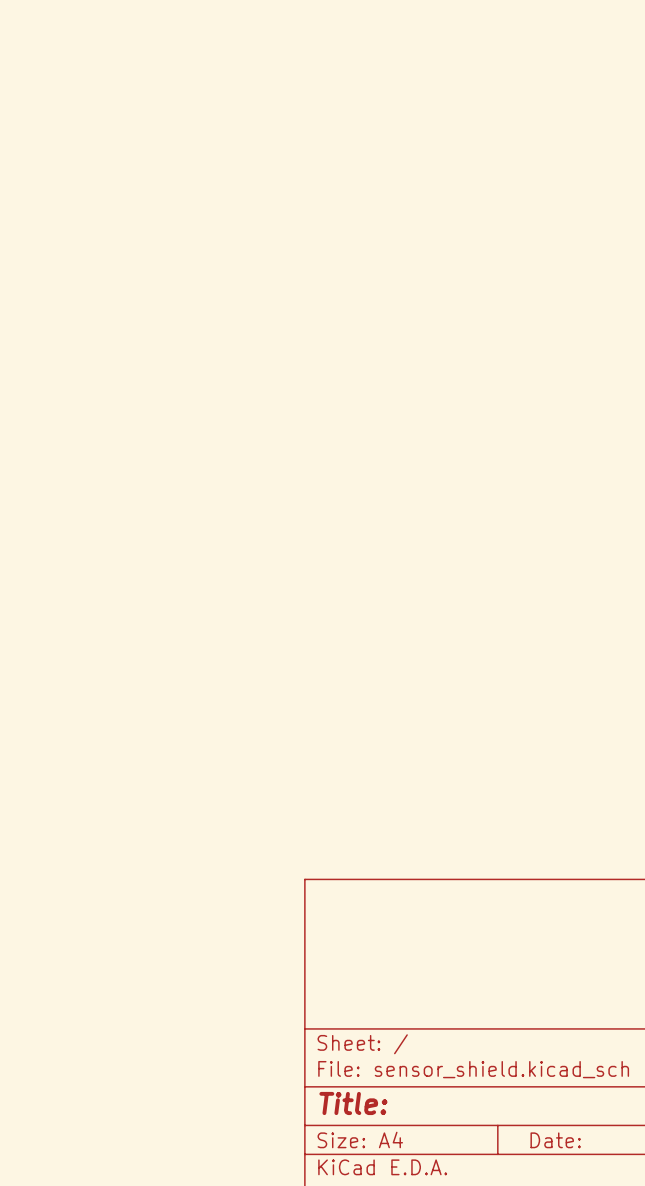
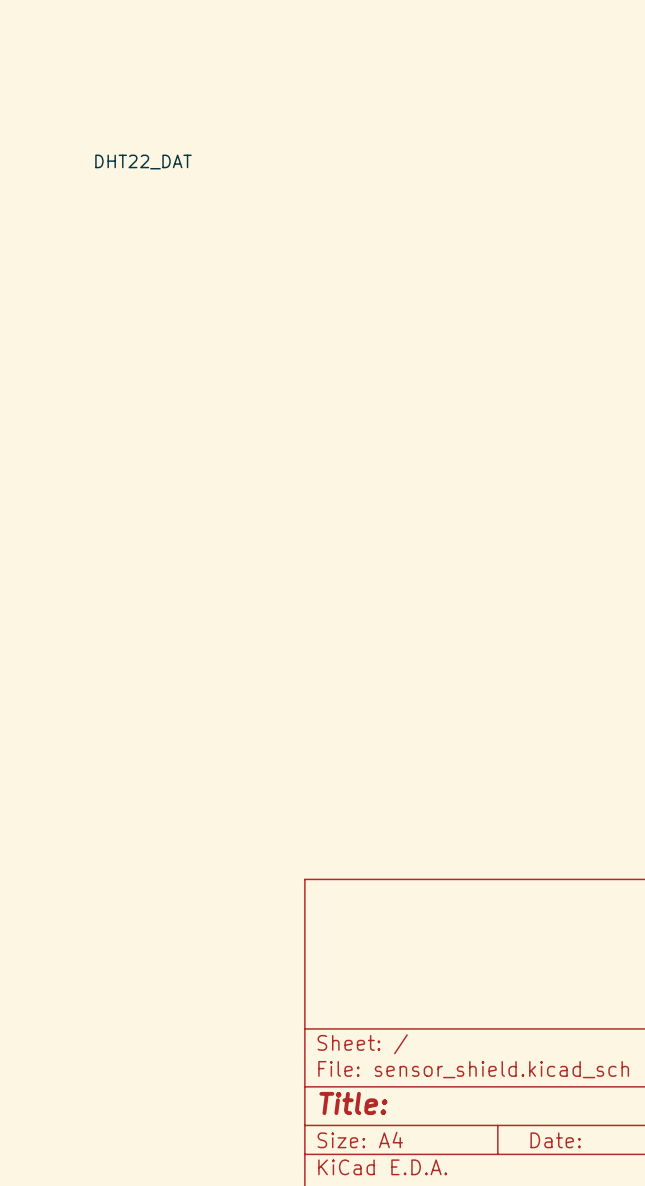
label: none -> DHT22_DAT (143, 162)

